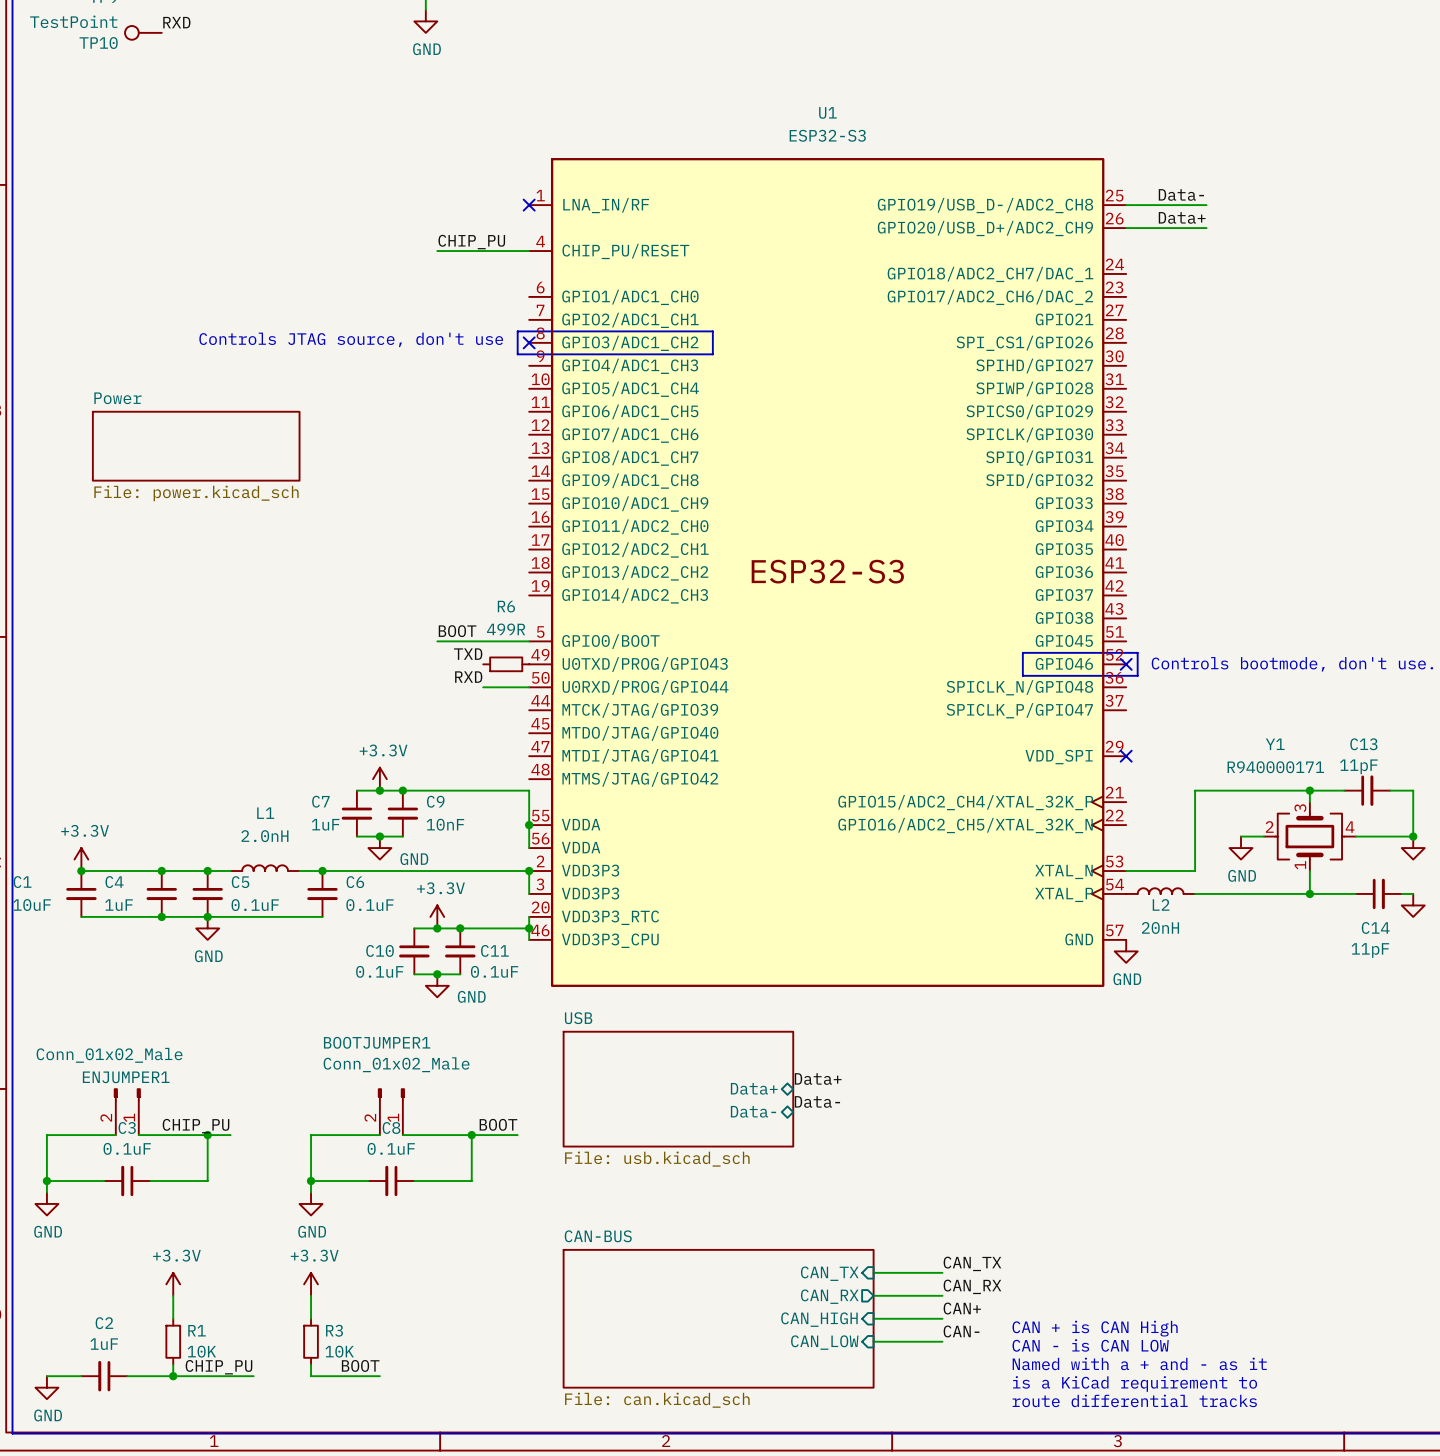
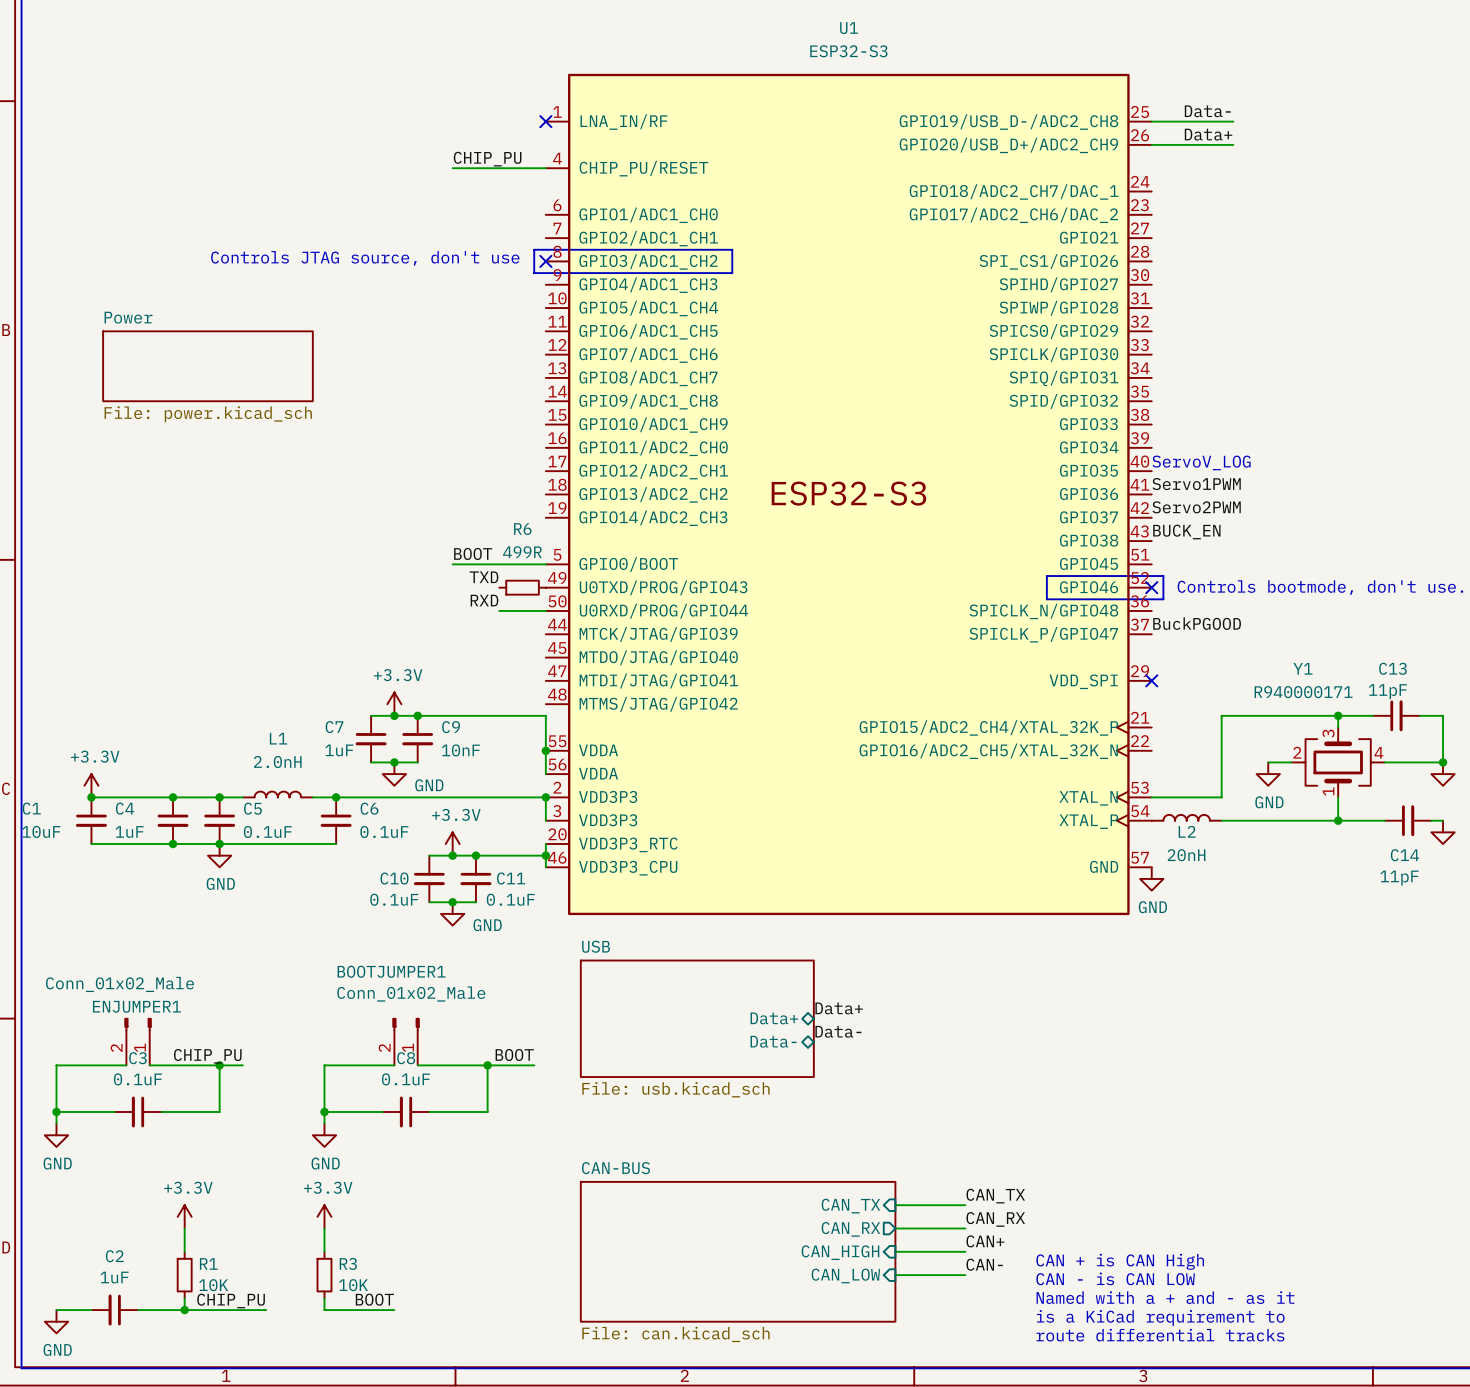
text: none -> ServoV_LOG (1201, 462)
label: none -> Servo1PWM (1196, 484)
label: none -> Servo2PWM (1196, 507)
label: none -> BUCK_EN (1186, 531)
label: none -> BuckPGOOD (1197, 623)

